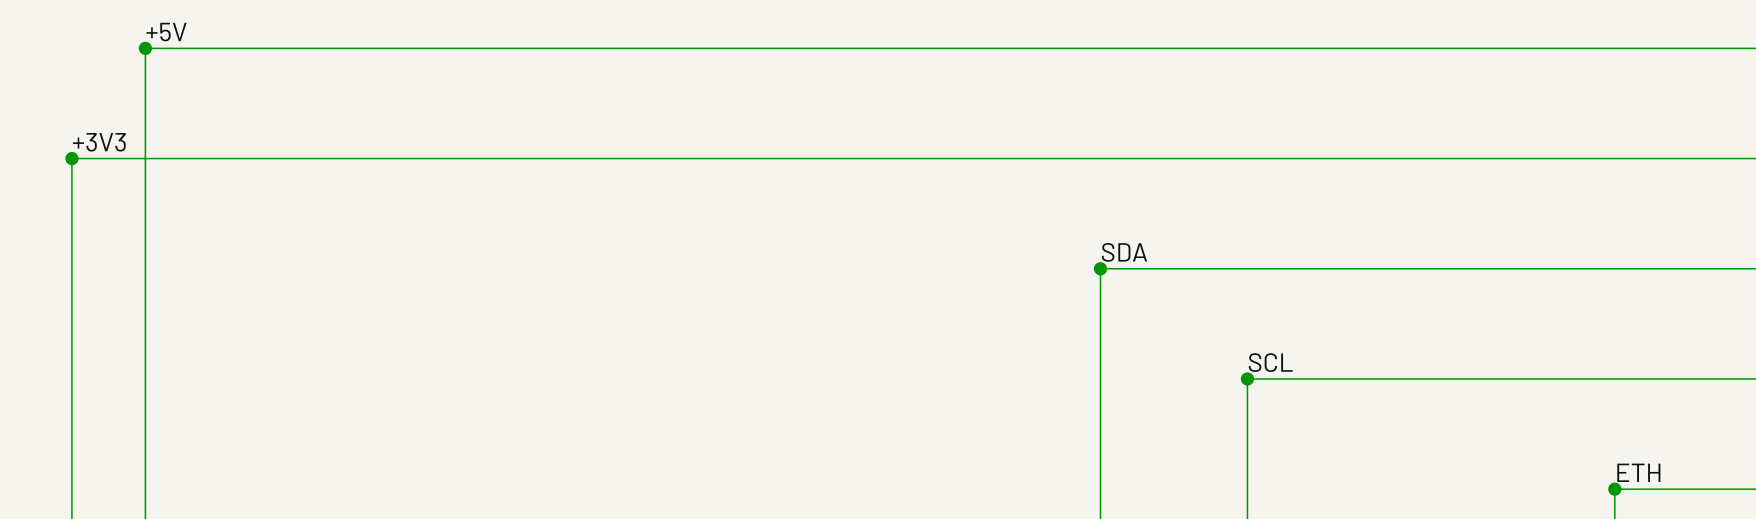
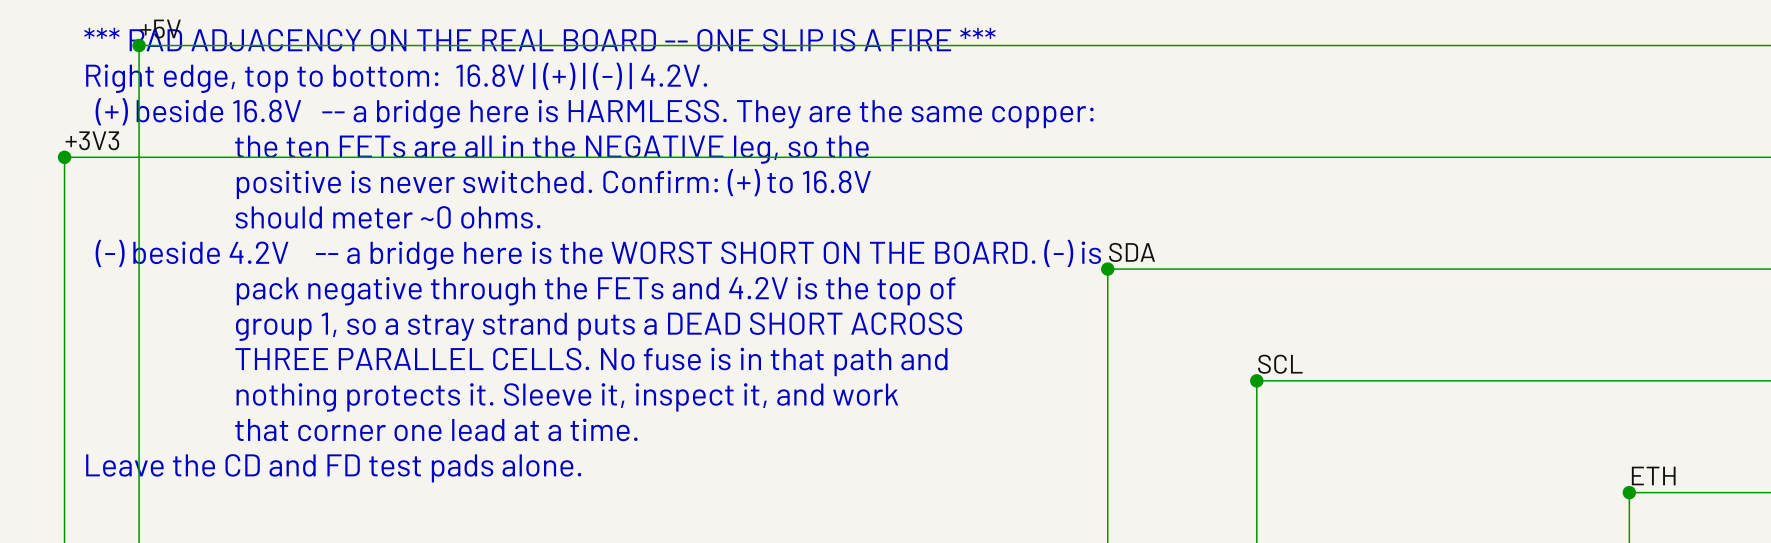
text: none -> *** PAD ADJACENCY ON THE REAL BOARD -- ONE SLIP IS A FIRE *** (539, 39)
text: none -> Right edge, top to bottom: 16.8V | (+) | (-) | 4.2V. (396, 77)
text: none -> (+) beside 16.8V -- a bridge here is HARMLESS. They are the same copper: (594, 113)
text: none -> the ten FETs are all in the NEGATIVE leg, so the (551, 149)
text: none -> positive is never switched. Confirm: (+) to 16.8V (553, 184)
text: none -> should meter ~0 ohms. (388, 217)
text: none -> (-) beside 4.2V -- a bridge here is the WORST SHORT ON THE BOARD. (-) is (598, 254)
text: none -> pack negative through the FETs and 4.2V is the top of (596, 291)
text: none -> group 1, so a stray strand puts a DEAD SHORT ACROSS (599, 326)
text: none -> THREE PARALLEL CELLS. No fuse is in that path and (591, 361)
text: none -> nothing protects it. Sleeve it, inspect it, and work (567, 397)
text: none -> that corner one lead at a time. (436, 429)
text: none -> Leave the CD and FD test pads alone. (333, 468)

